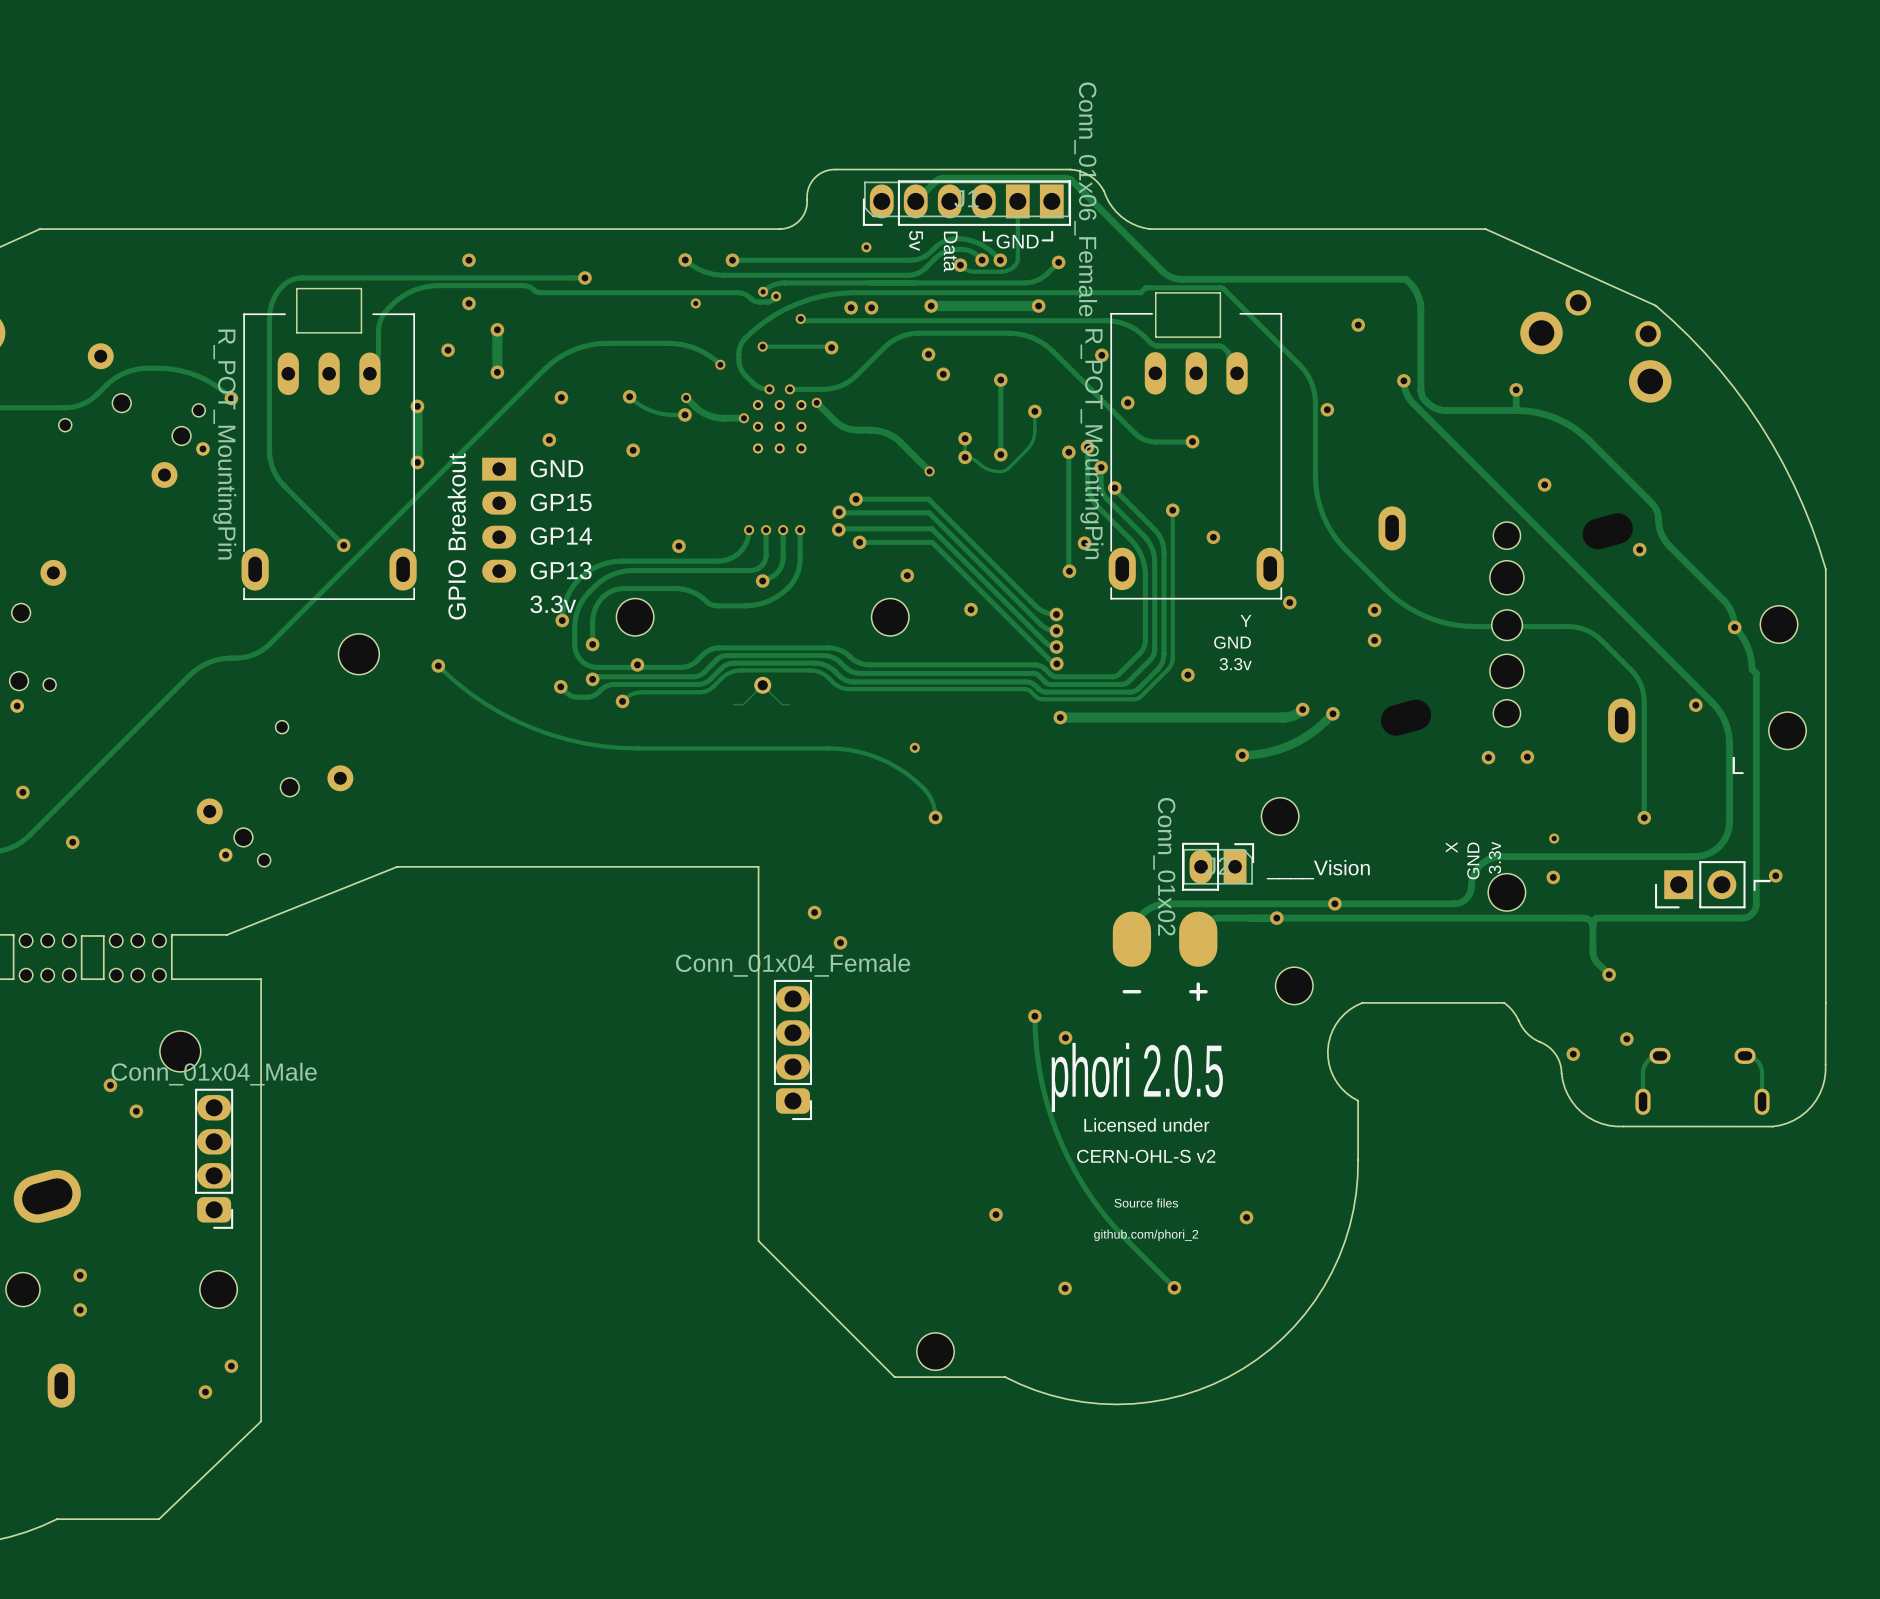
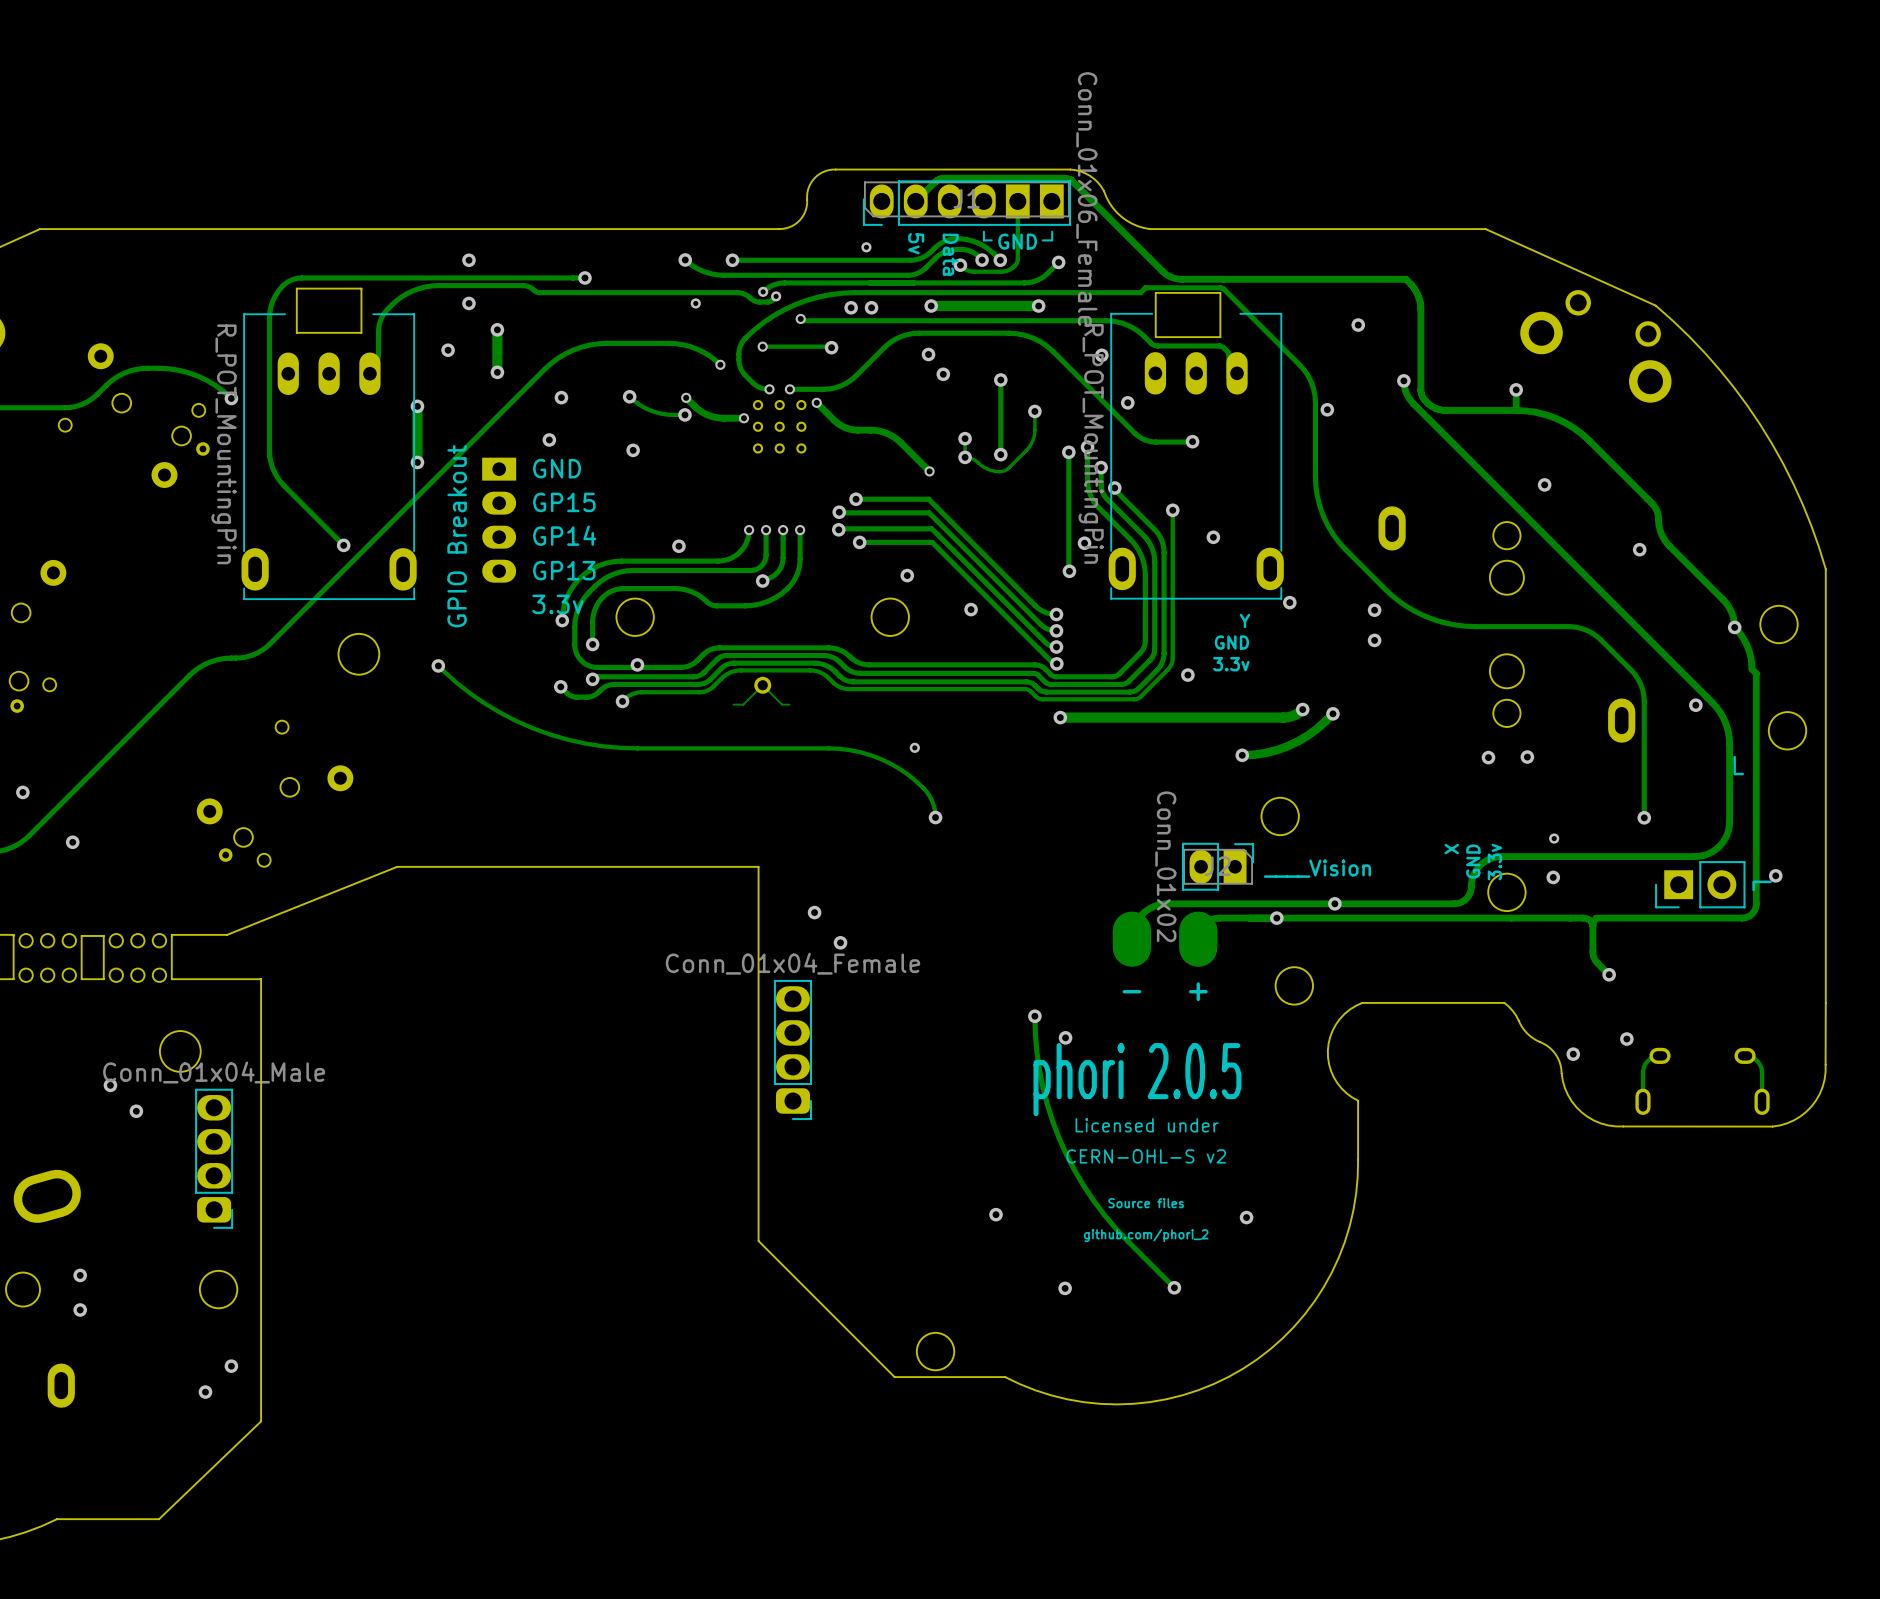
part: (1507, 625) -> none

